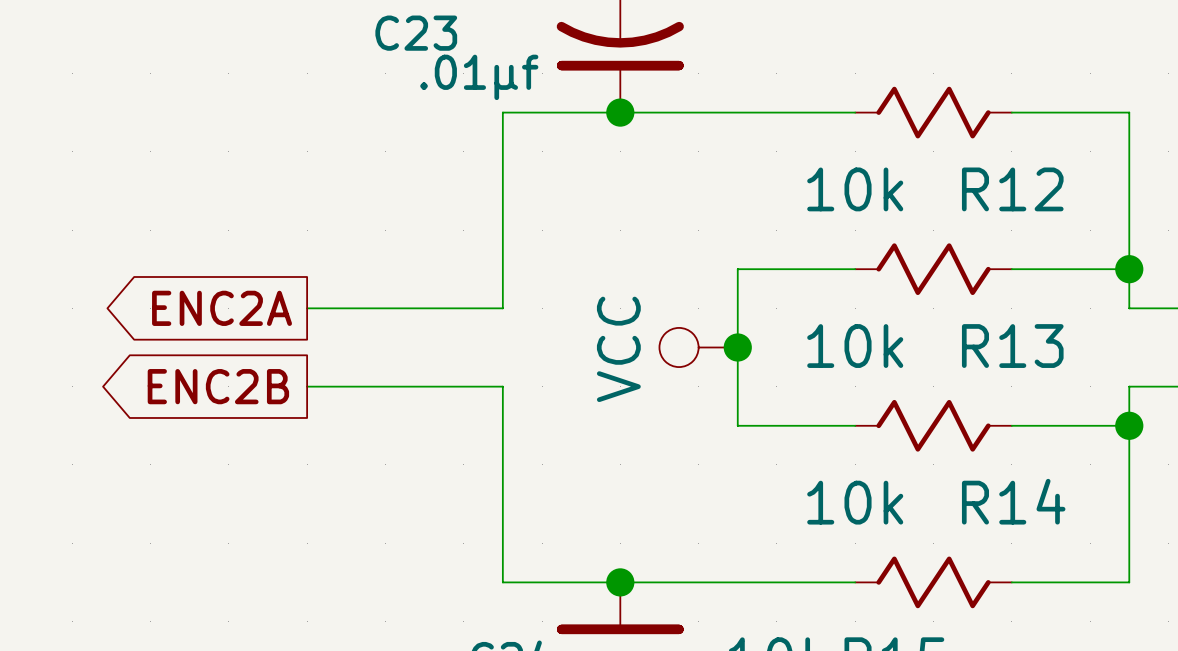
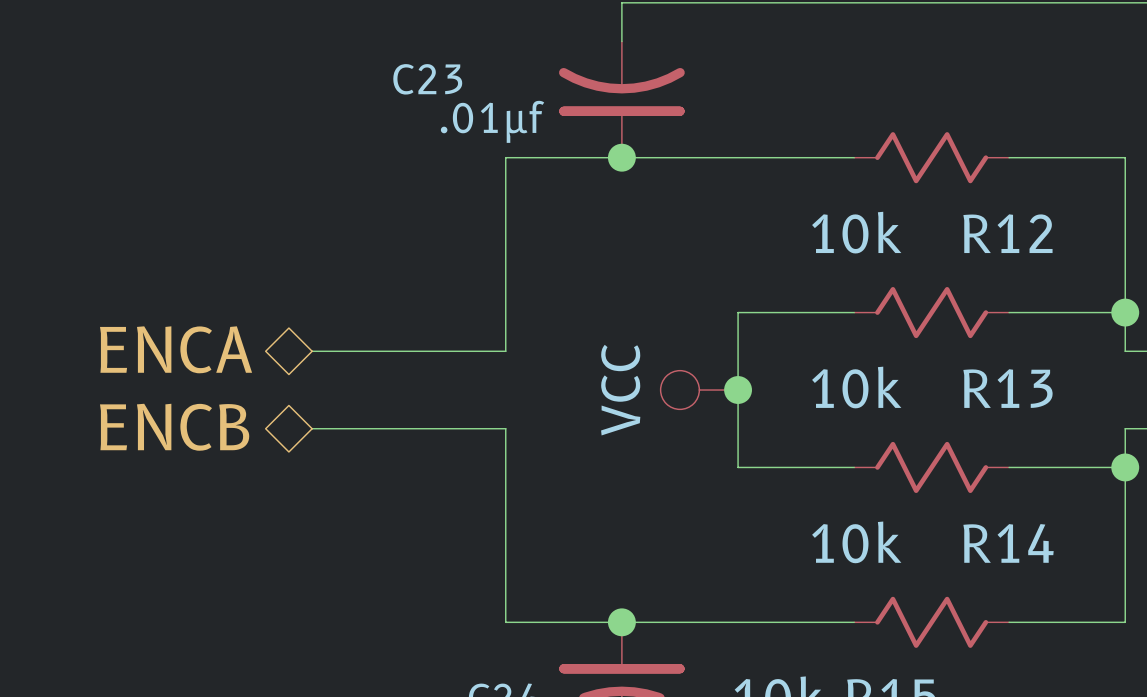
hierarchical label: none -> ENCA (176, 349)
global label: ENC2A (222, 308) -> none
hierarchical label: none -> ENCB (174, 427)
global label: ENC2B (218, 386) -> none

